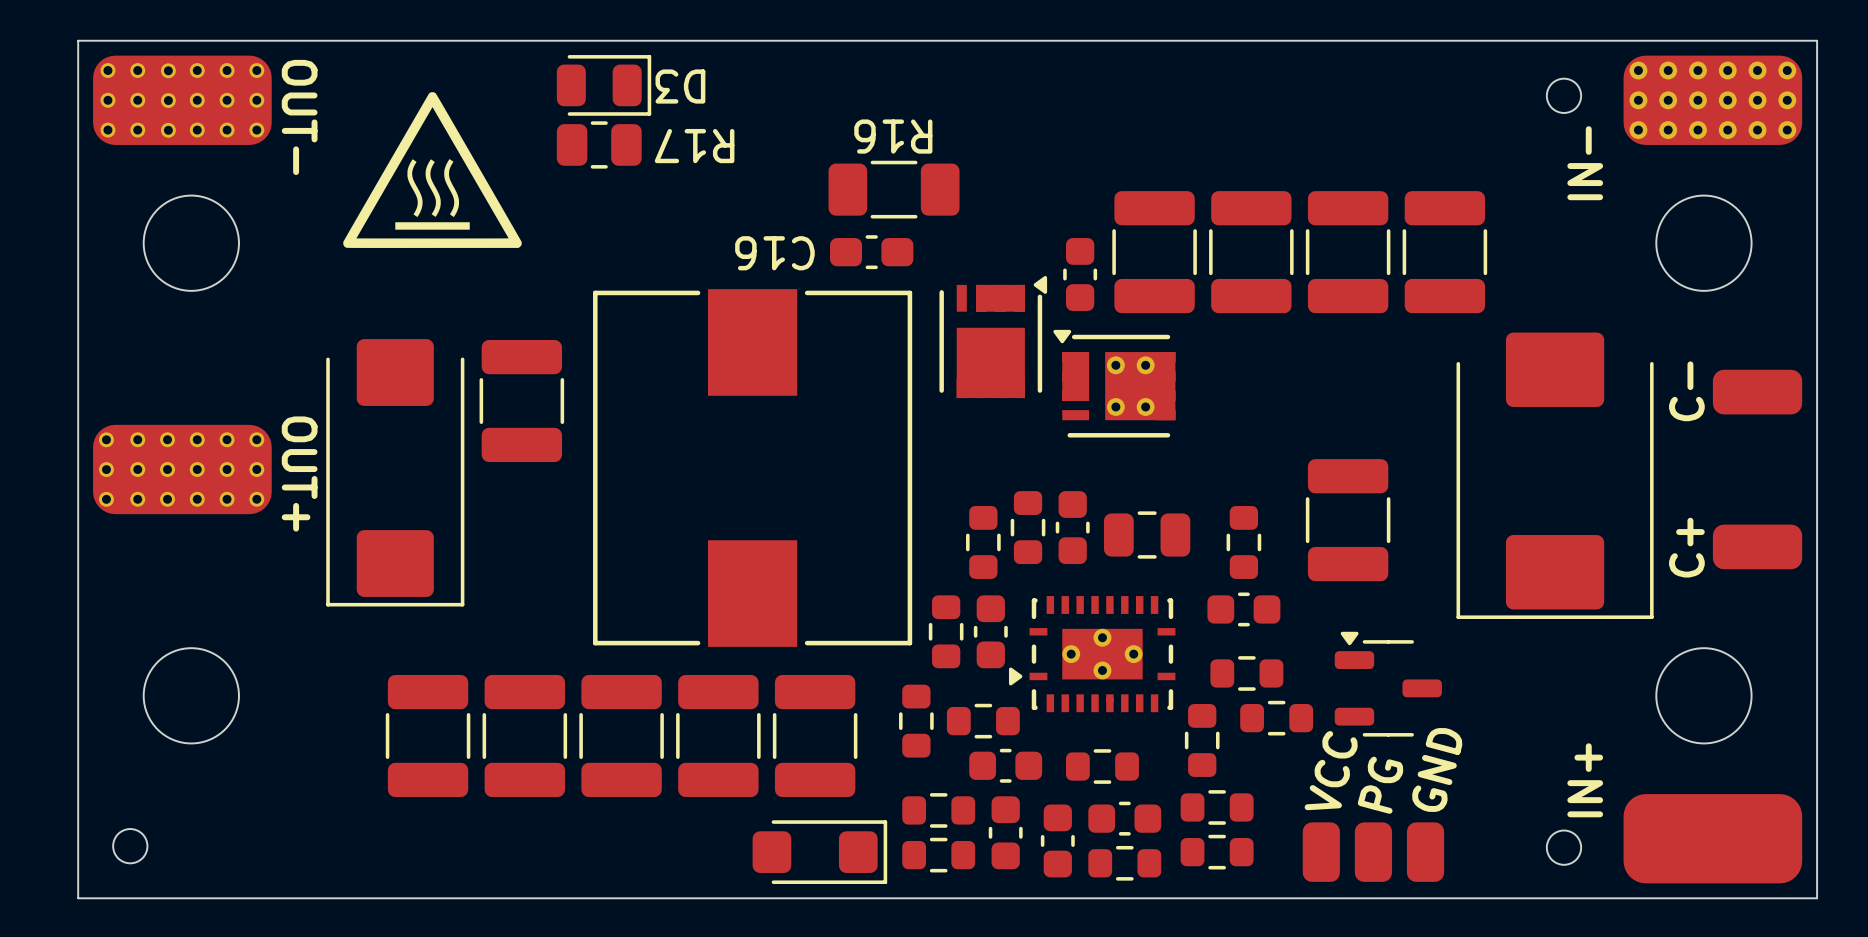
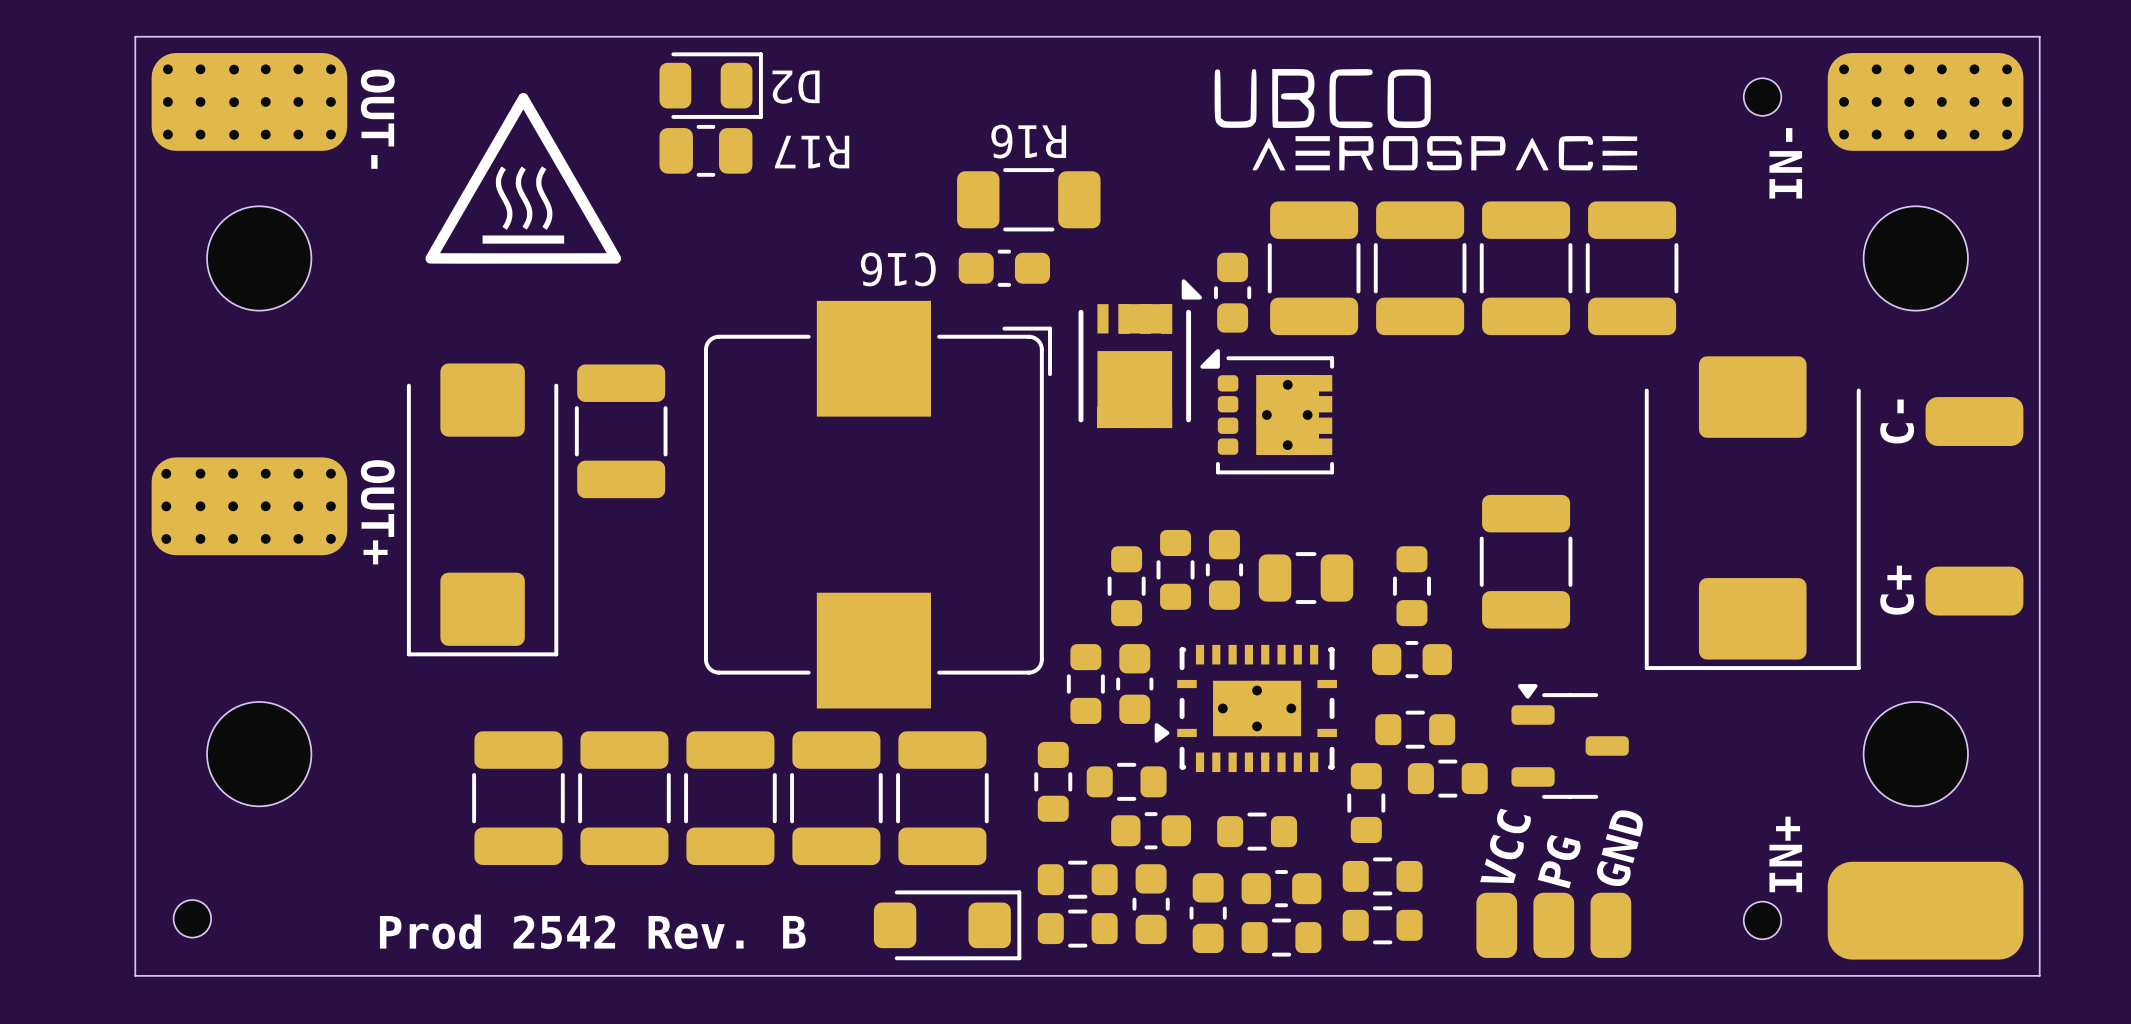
drawing: none -> [1214, 69, 1638, 171]
D3 name: D3 (680, 86) -> D2 (796, 87)
part footprint: [939, 275, 1048, 399] -> [1078, 279, 1202, 429]
part footprint: [593, 289, 913, 647] -> [704, 300, 1052, 709]
part footprint: [1053, 329, 1176, 438] -> [1200, 349, 1335, 475]
text: none -> Prod 2542 Rev. B (592, 931)

